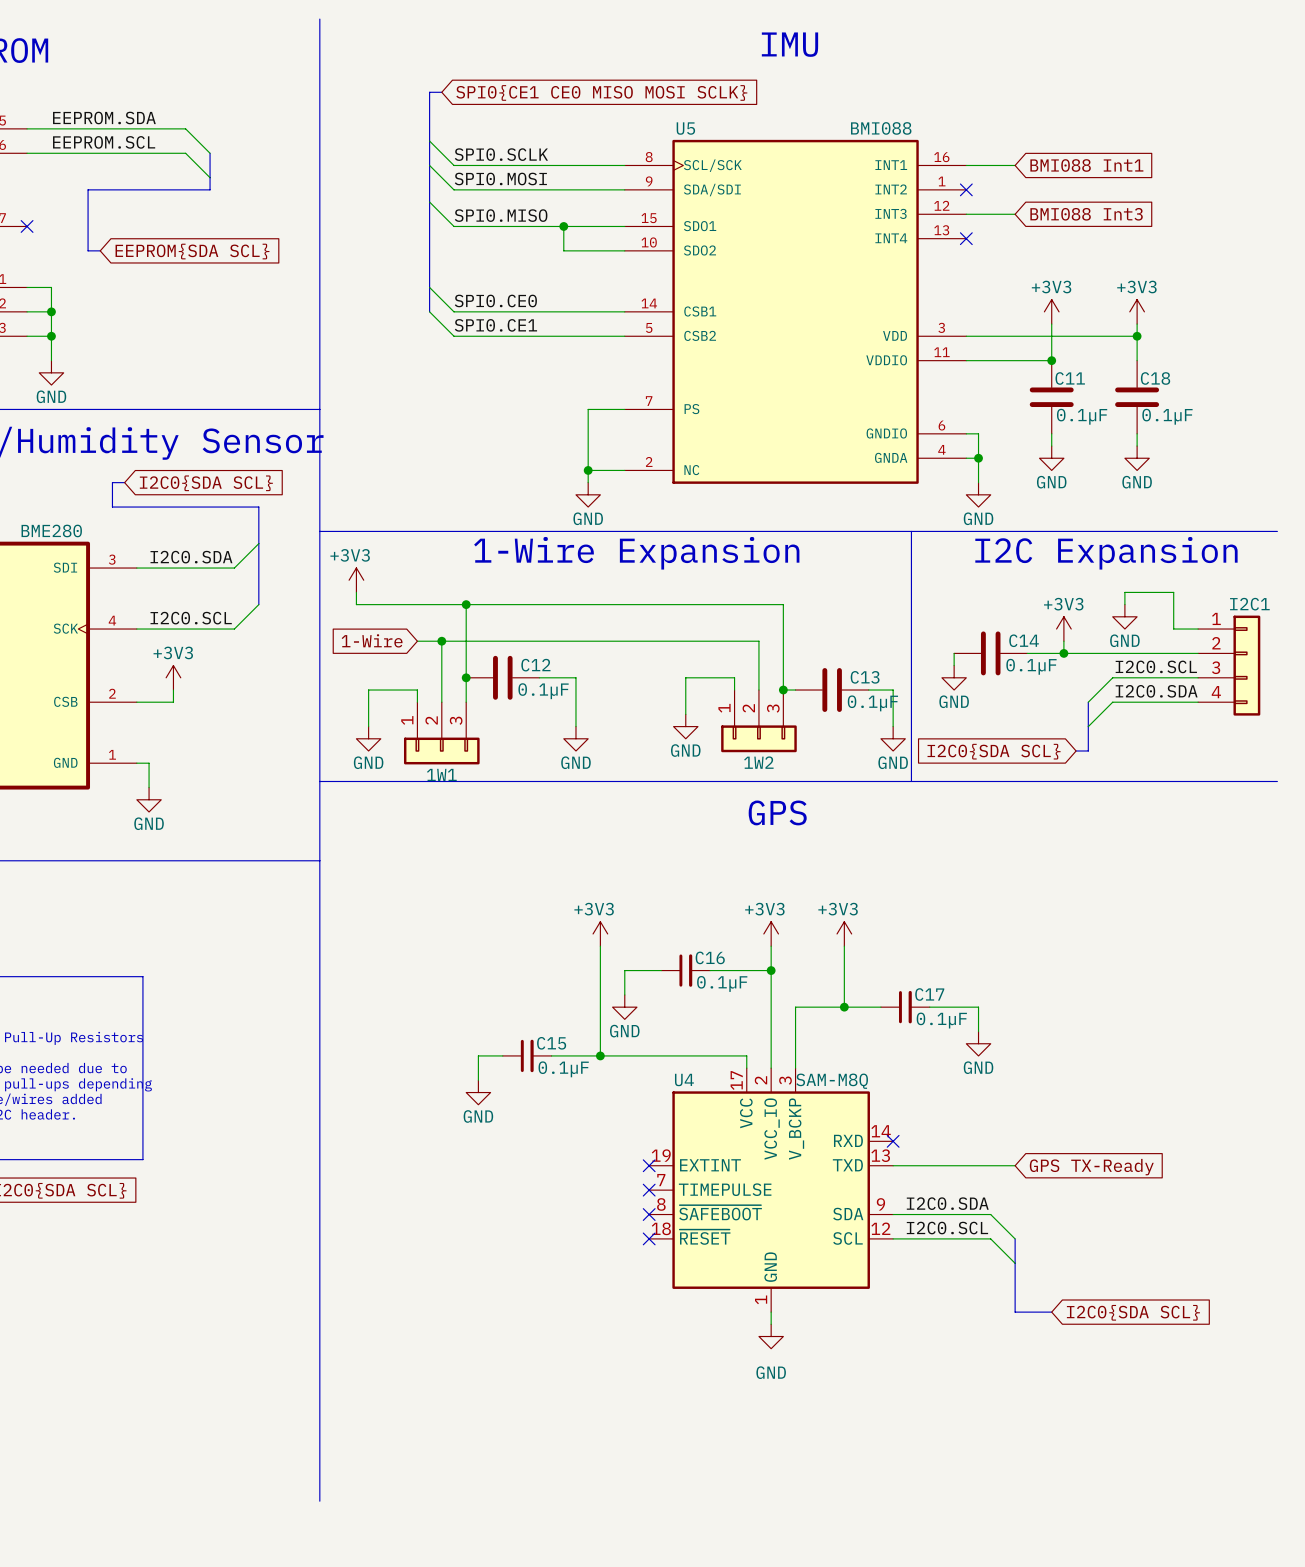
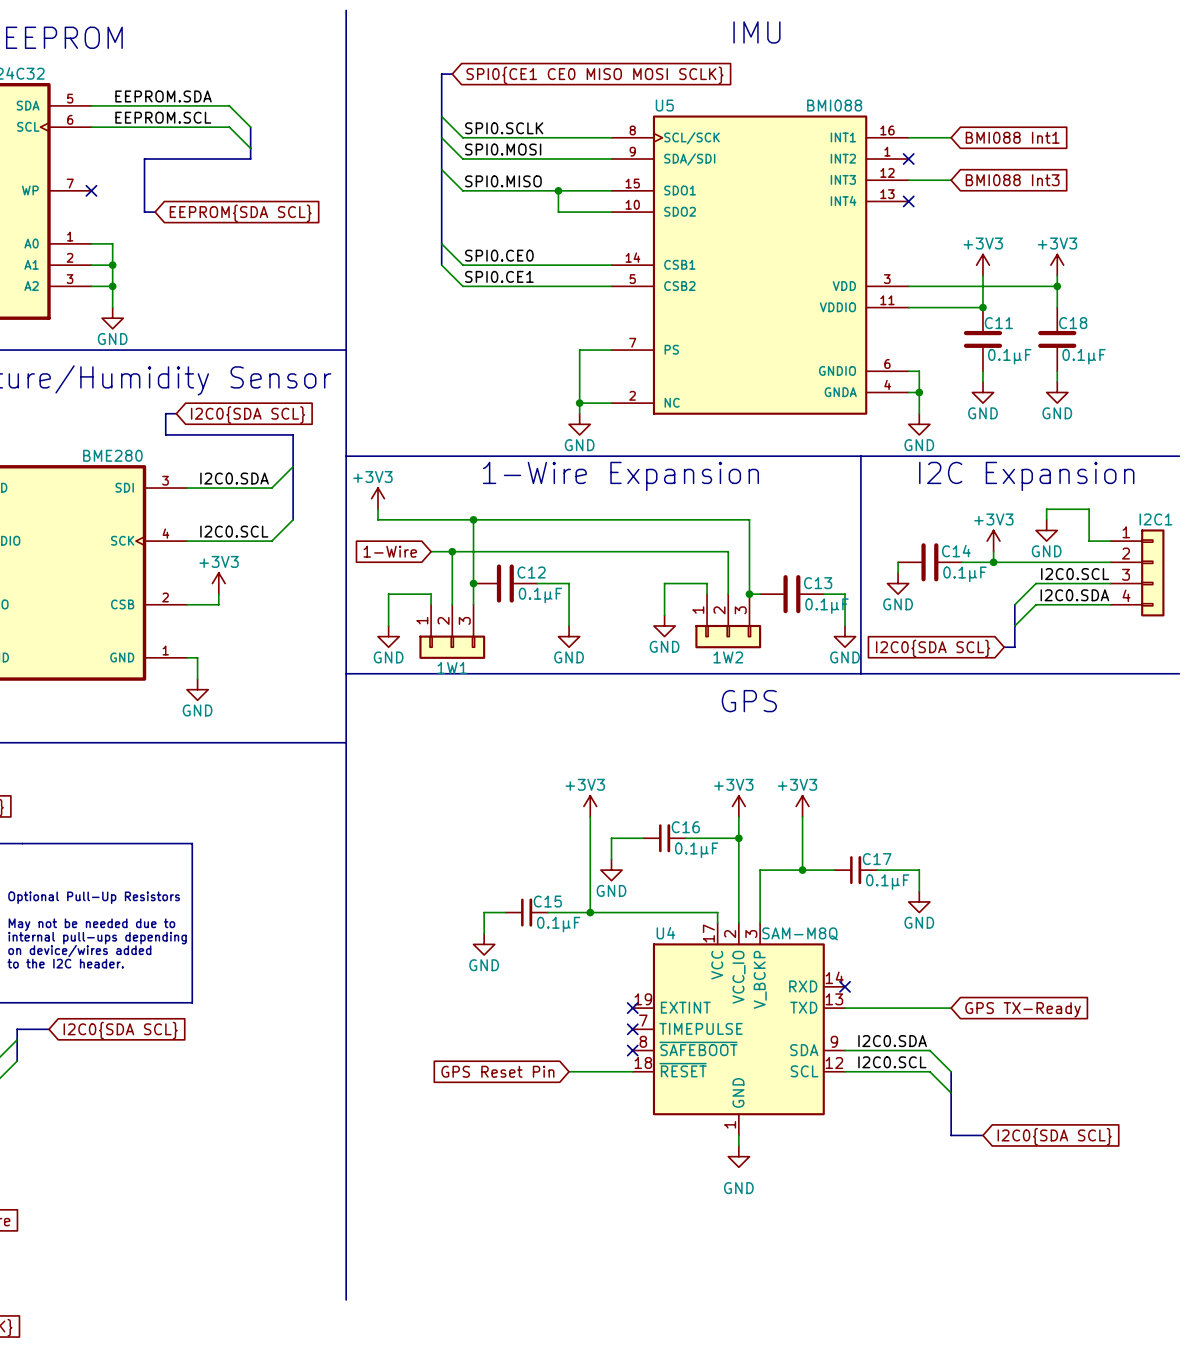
global label: none -> GPS Reset Pin (497, 1071)
wire: none -> (569, 1071) (632, 1071)
no-connect mark: (649, 1238) -> none

